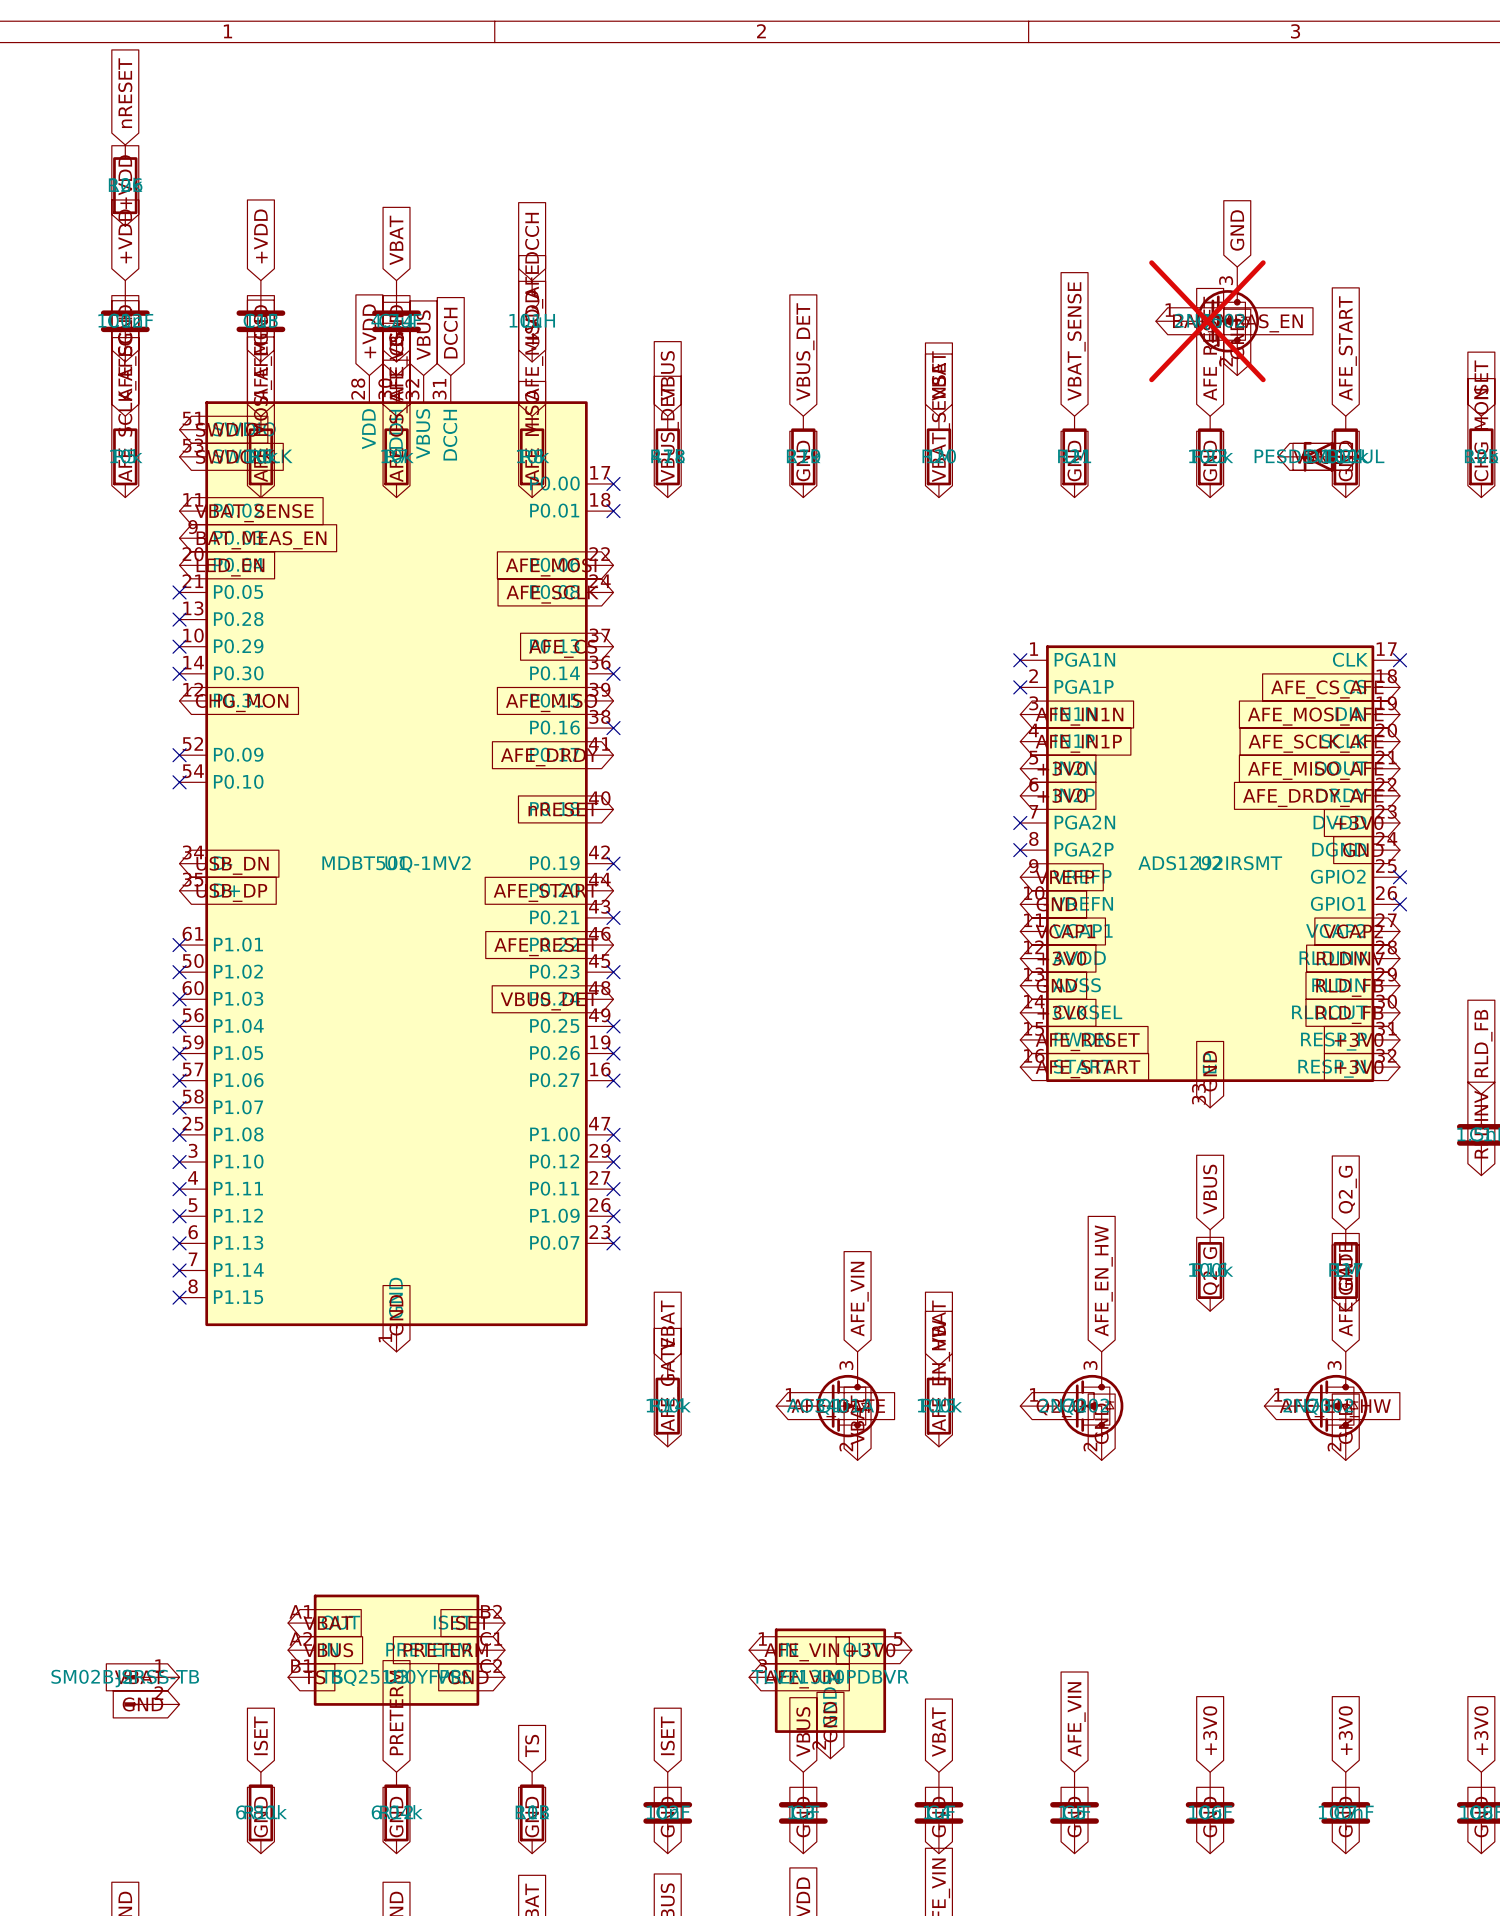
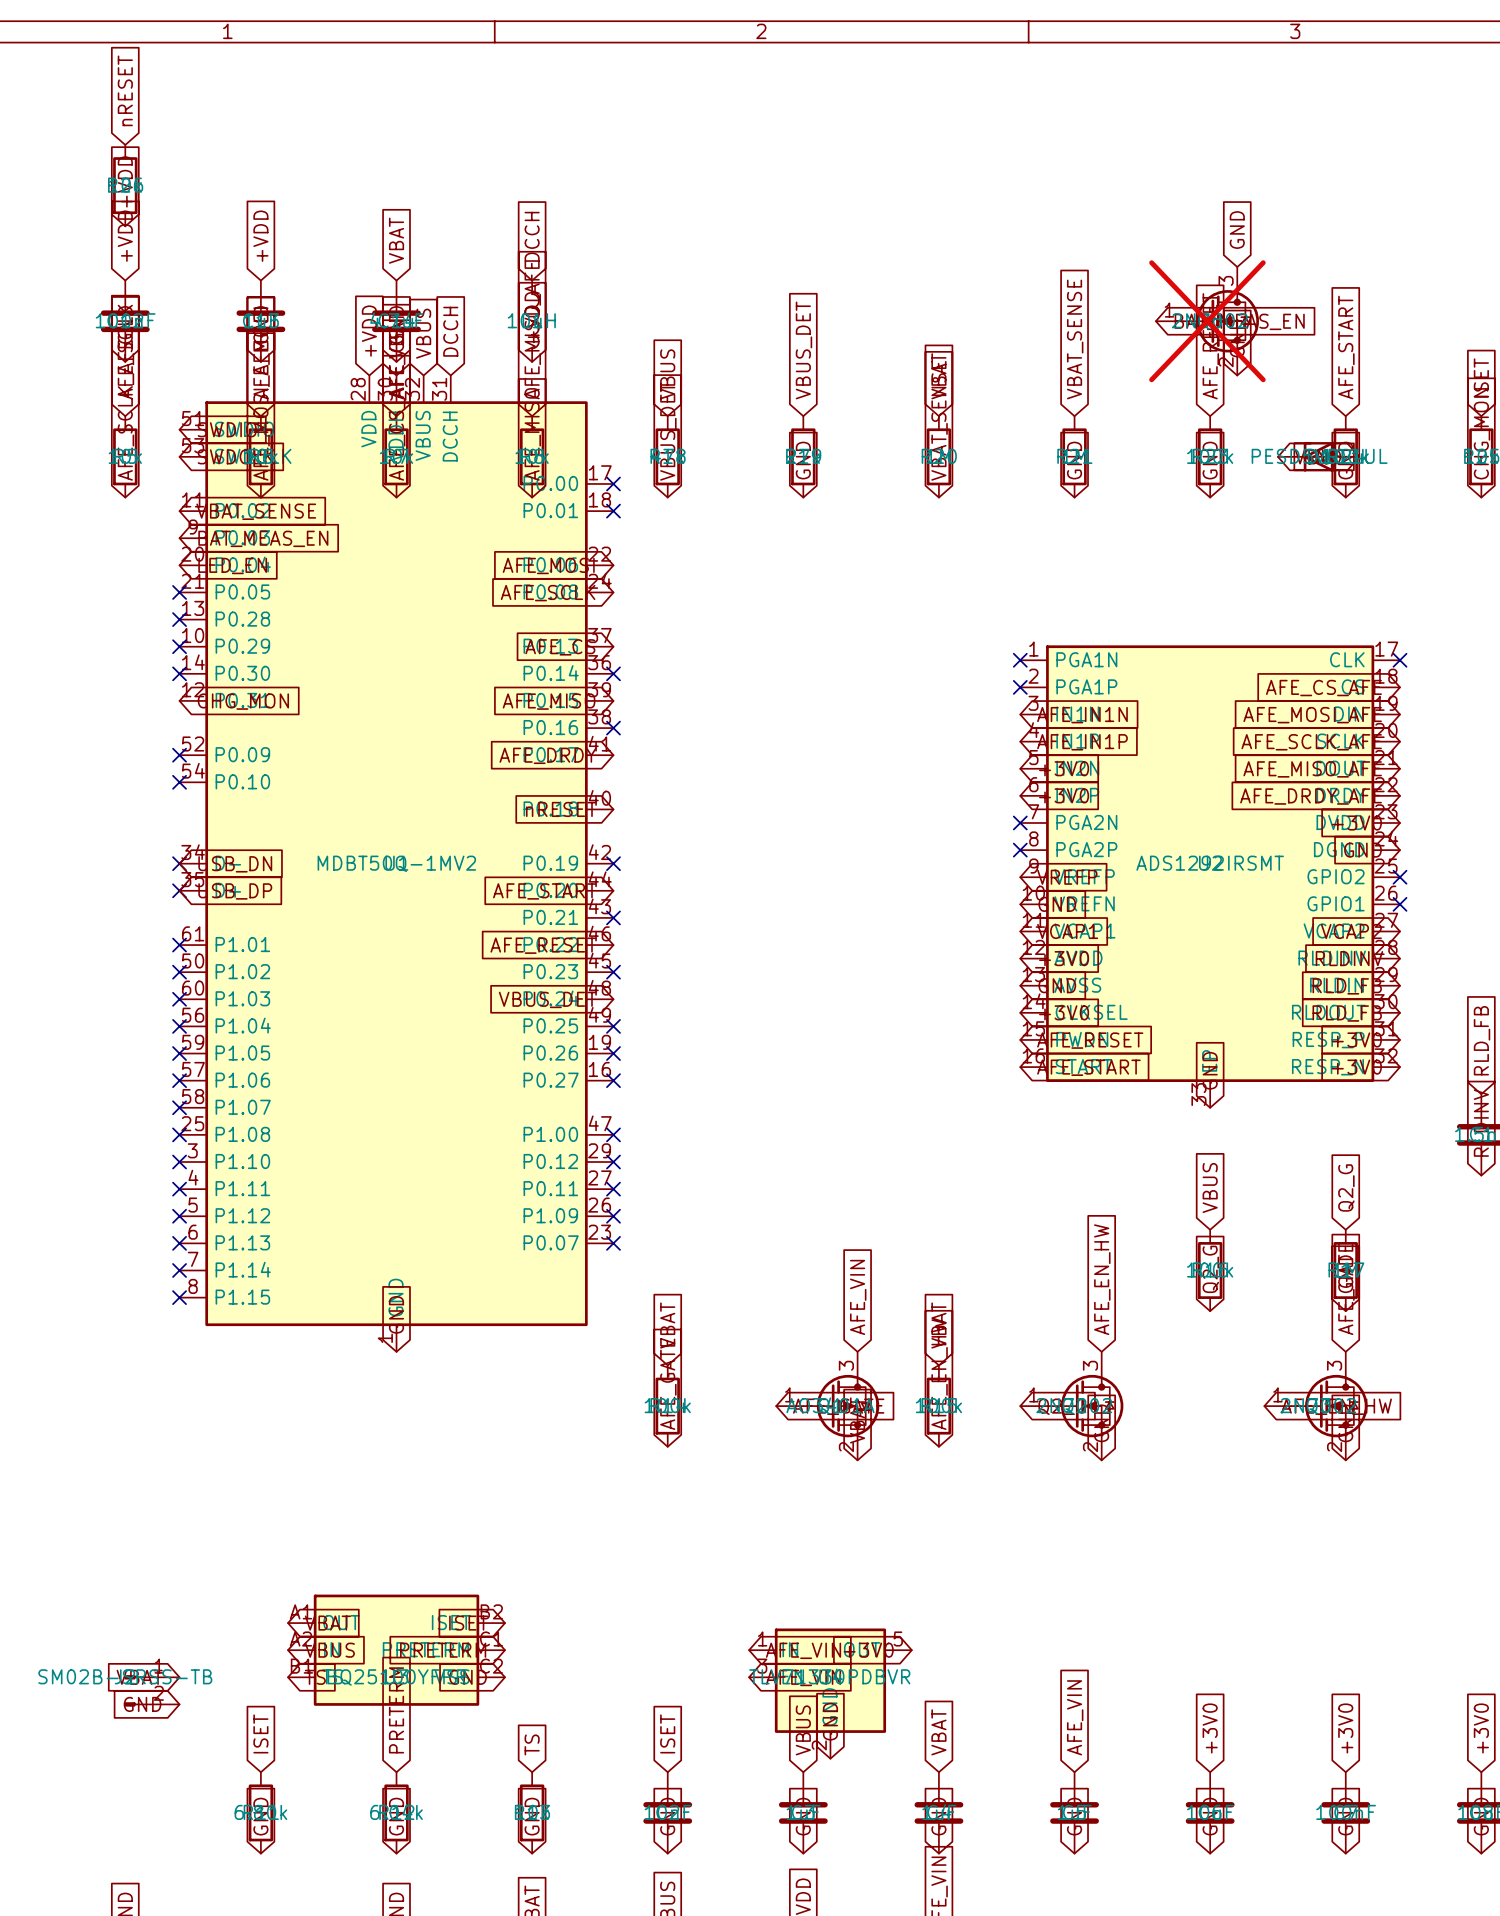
no-connect mark: none -> (179, 863)
no-connect mark: none -> (179, 890)

